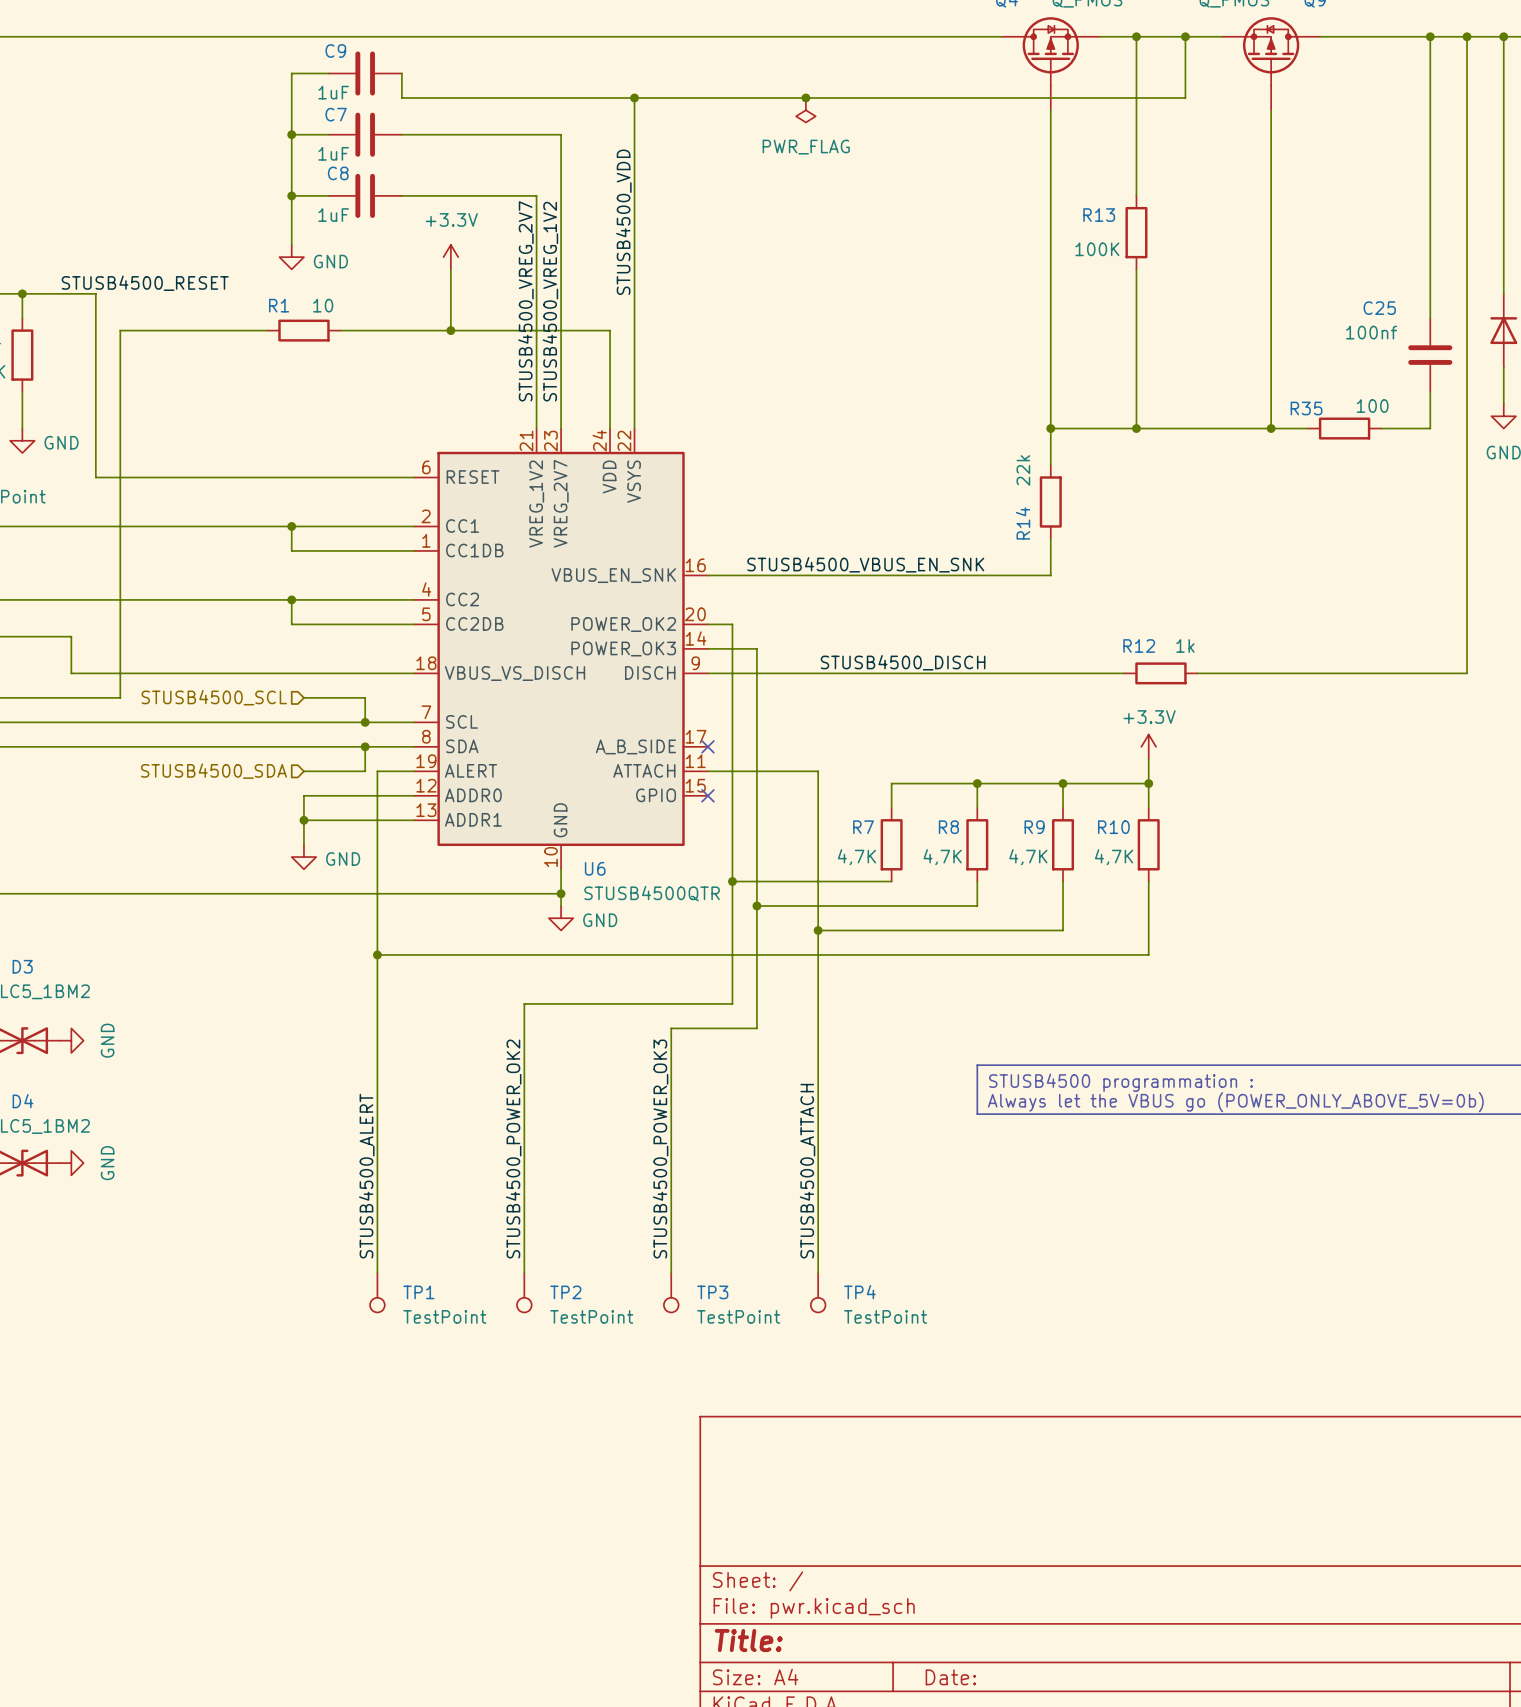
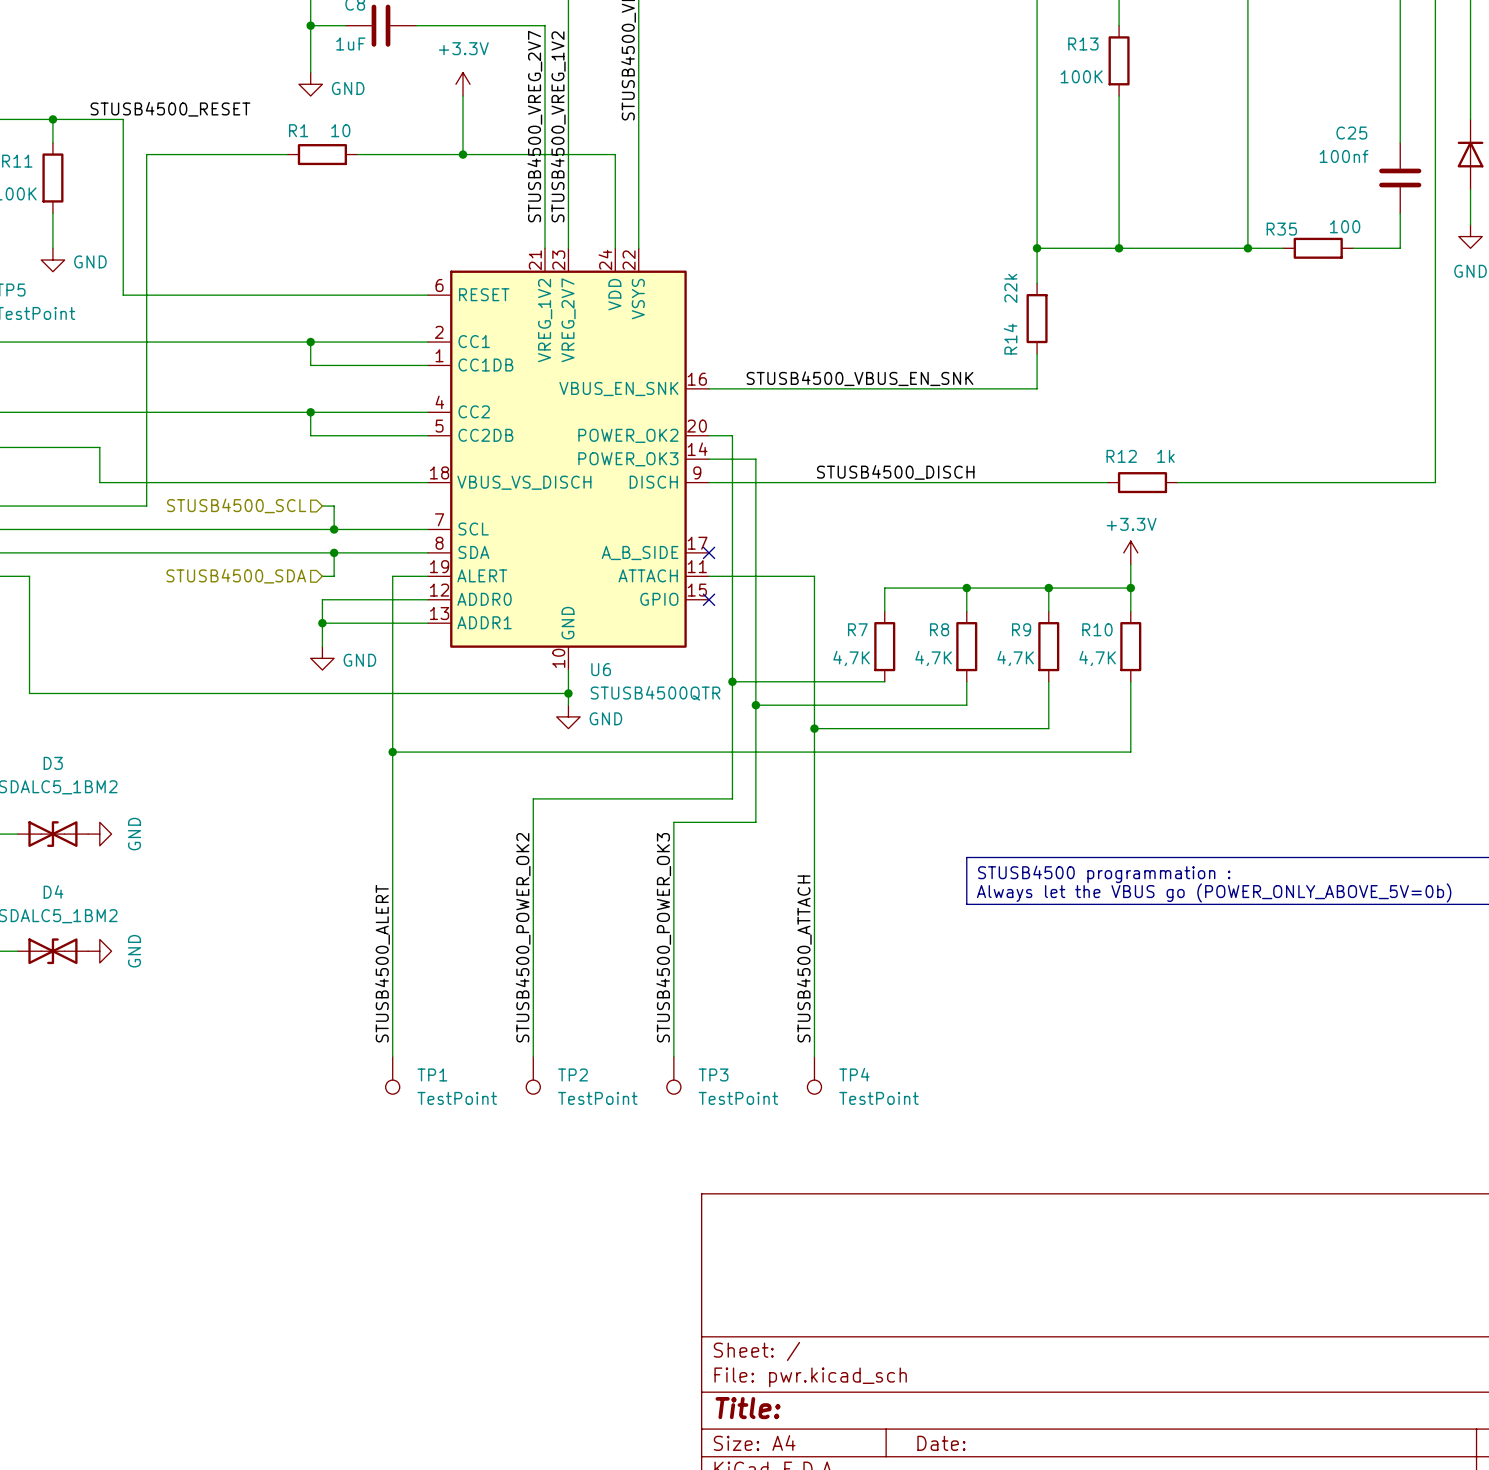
wire: (316, 697) (365, 697) (365, 722) -> (334, 506) (334, 529)
junction: none -> (334, 529)
junction: (365, 722) -> none
junction: none -> (334, 552)
wire: (365, 746) (365, 771) (316, 771) -> (334, 552) (334, 576)
junction: (365, 746) -> none

